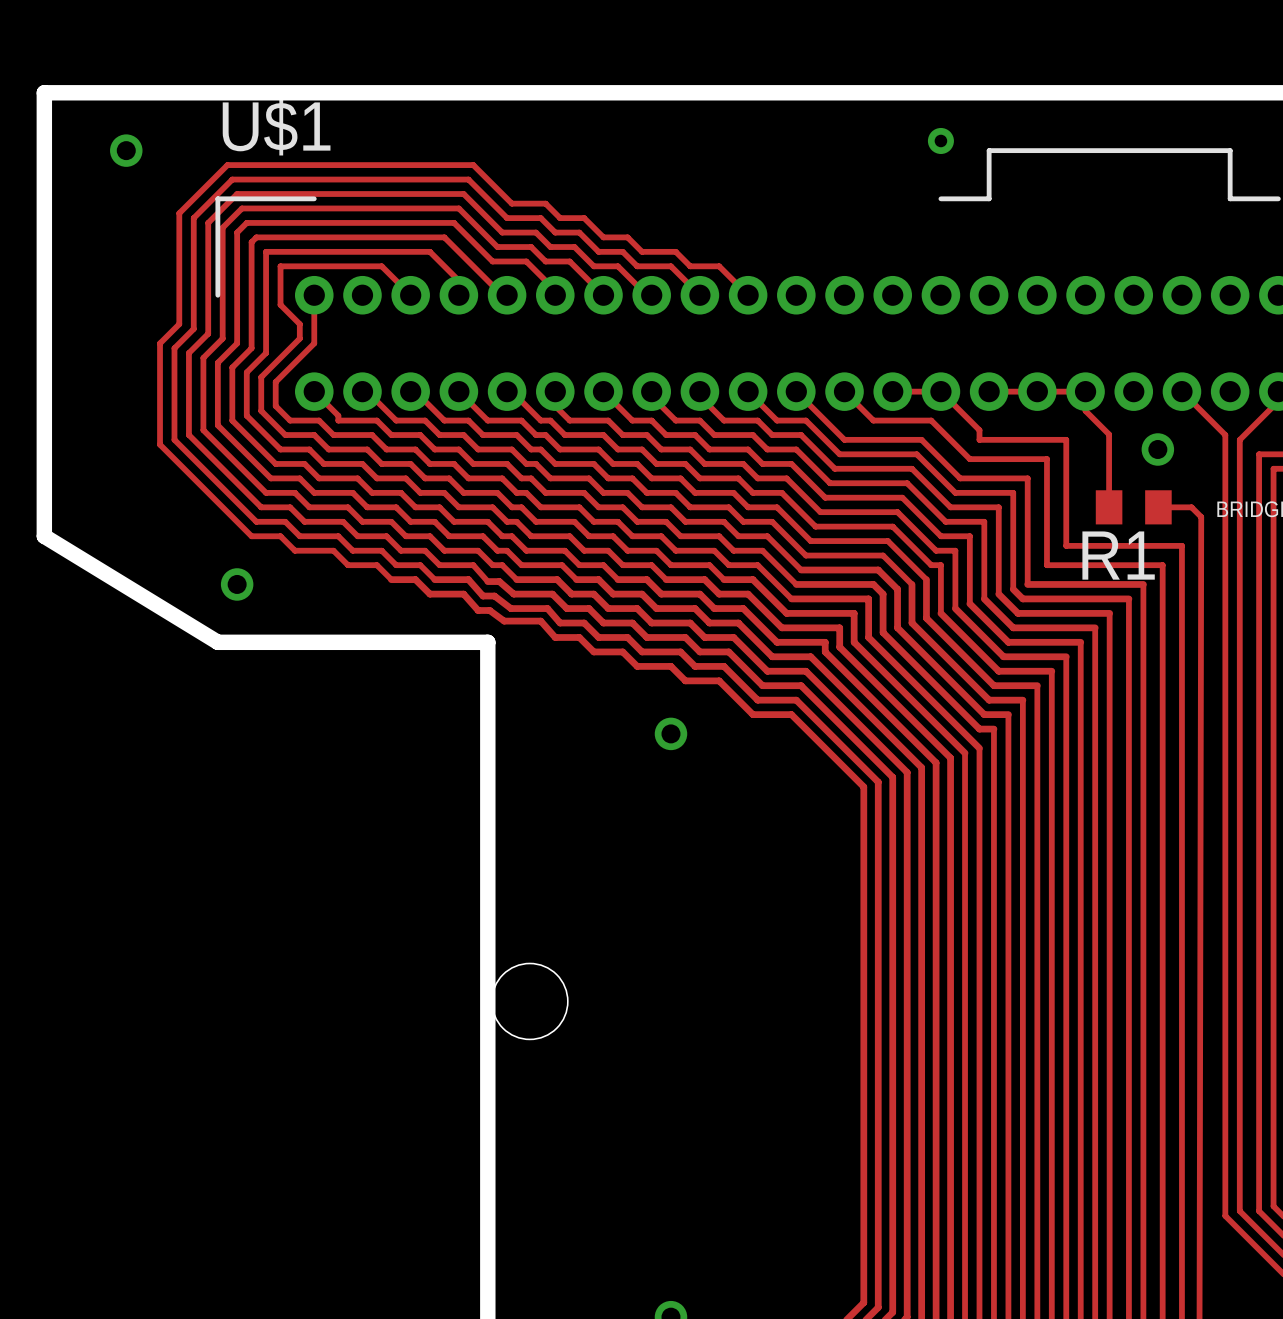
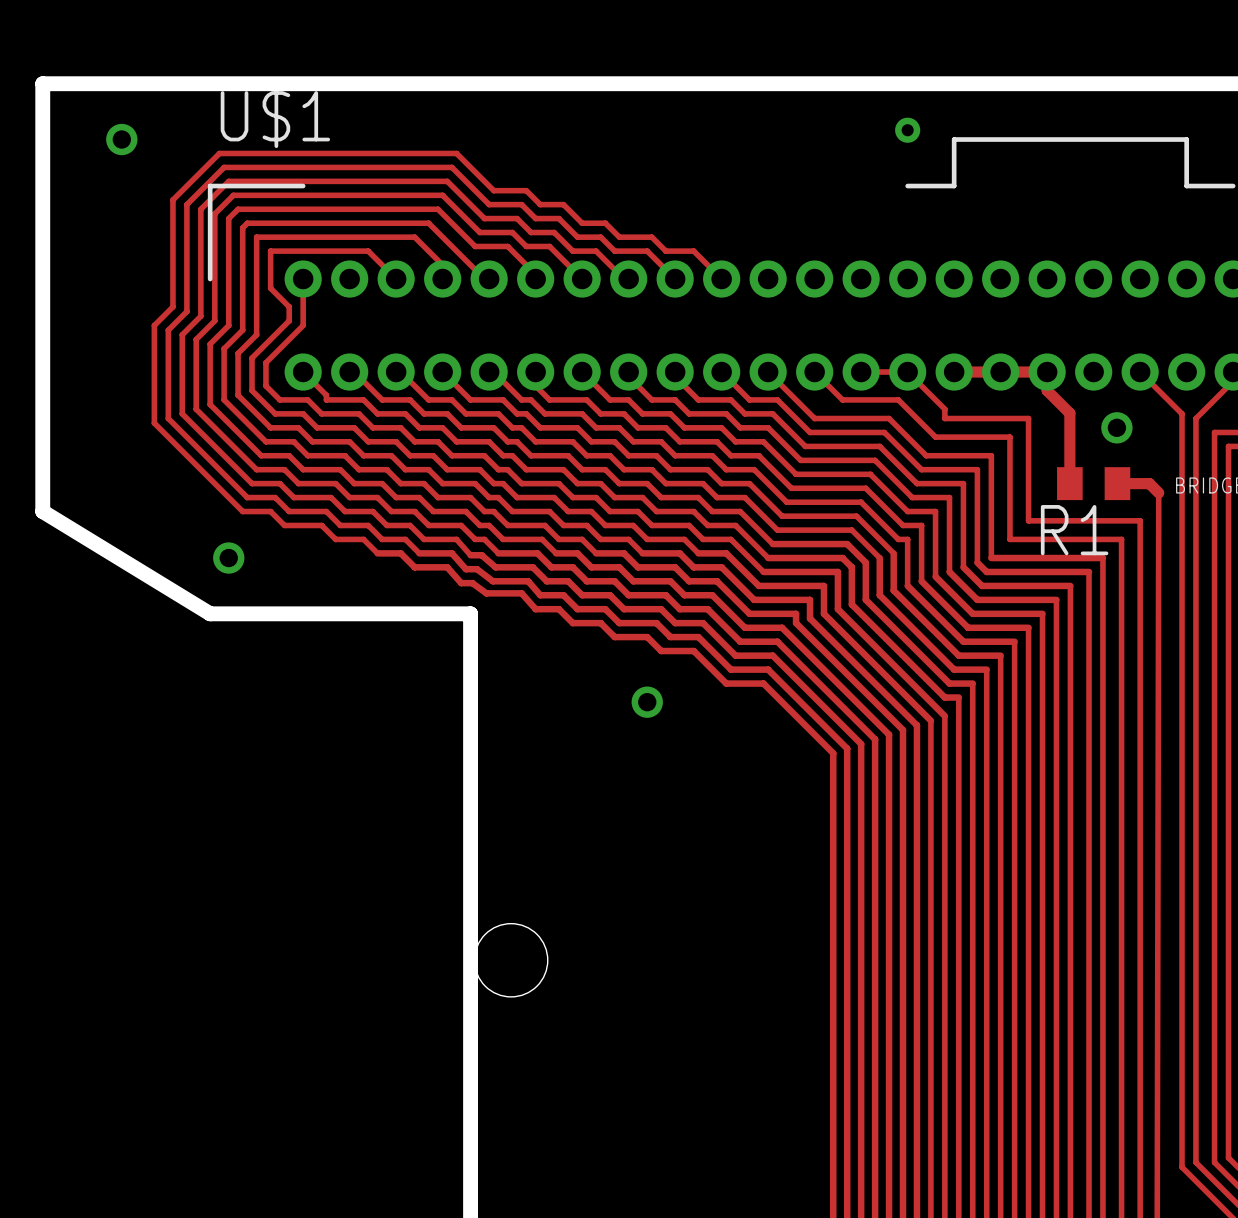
track width: thin (989, 391) (1085, 391) (1085, 410) (1109, 434) (1109, 507) -> thick (954, 372) (1047, 372) (1047, 390) (1069, 413) (1069, 483)
track width: thin (1158, 507) (1191, 507) (1201, 516) -> thick (1117, 483) (1149, 483) (1158, 492)

